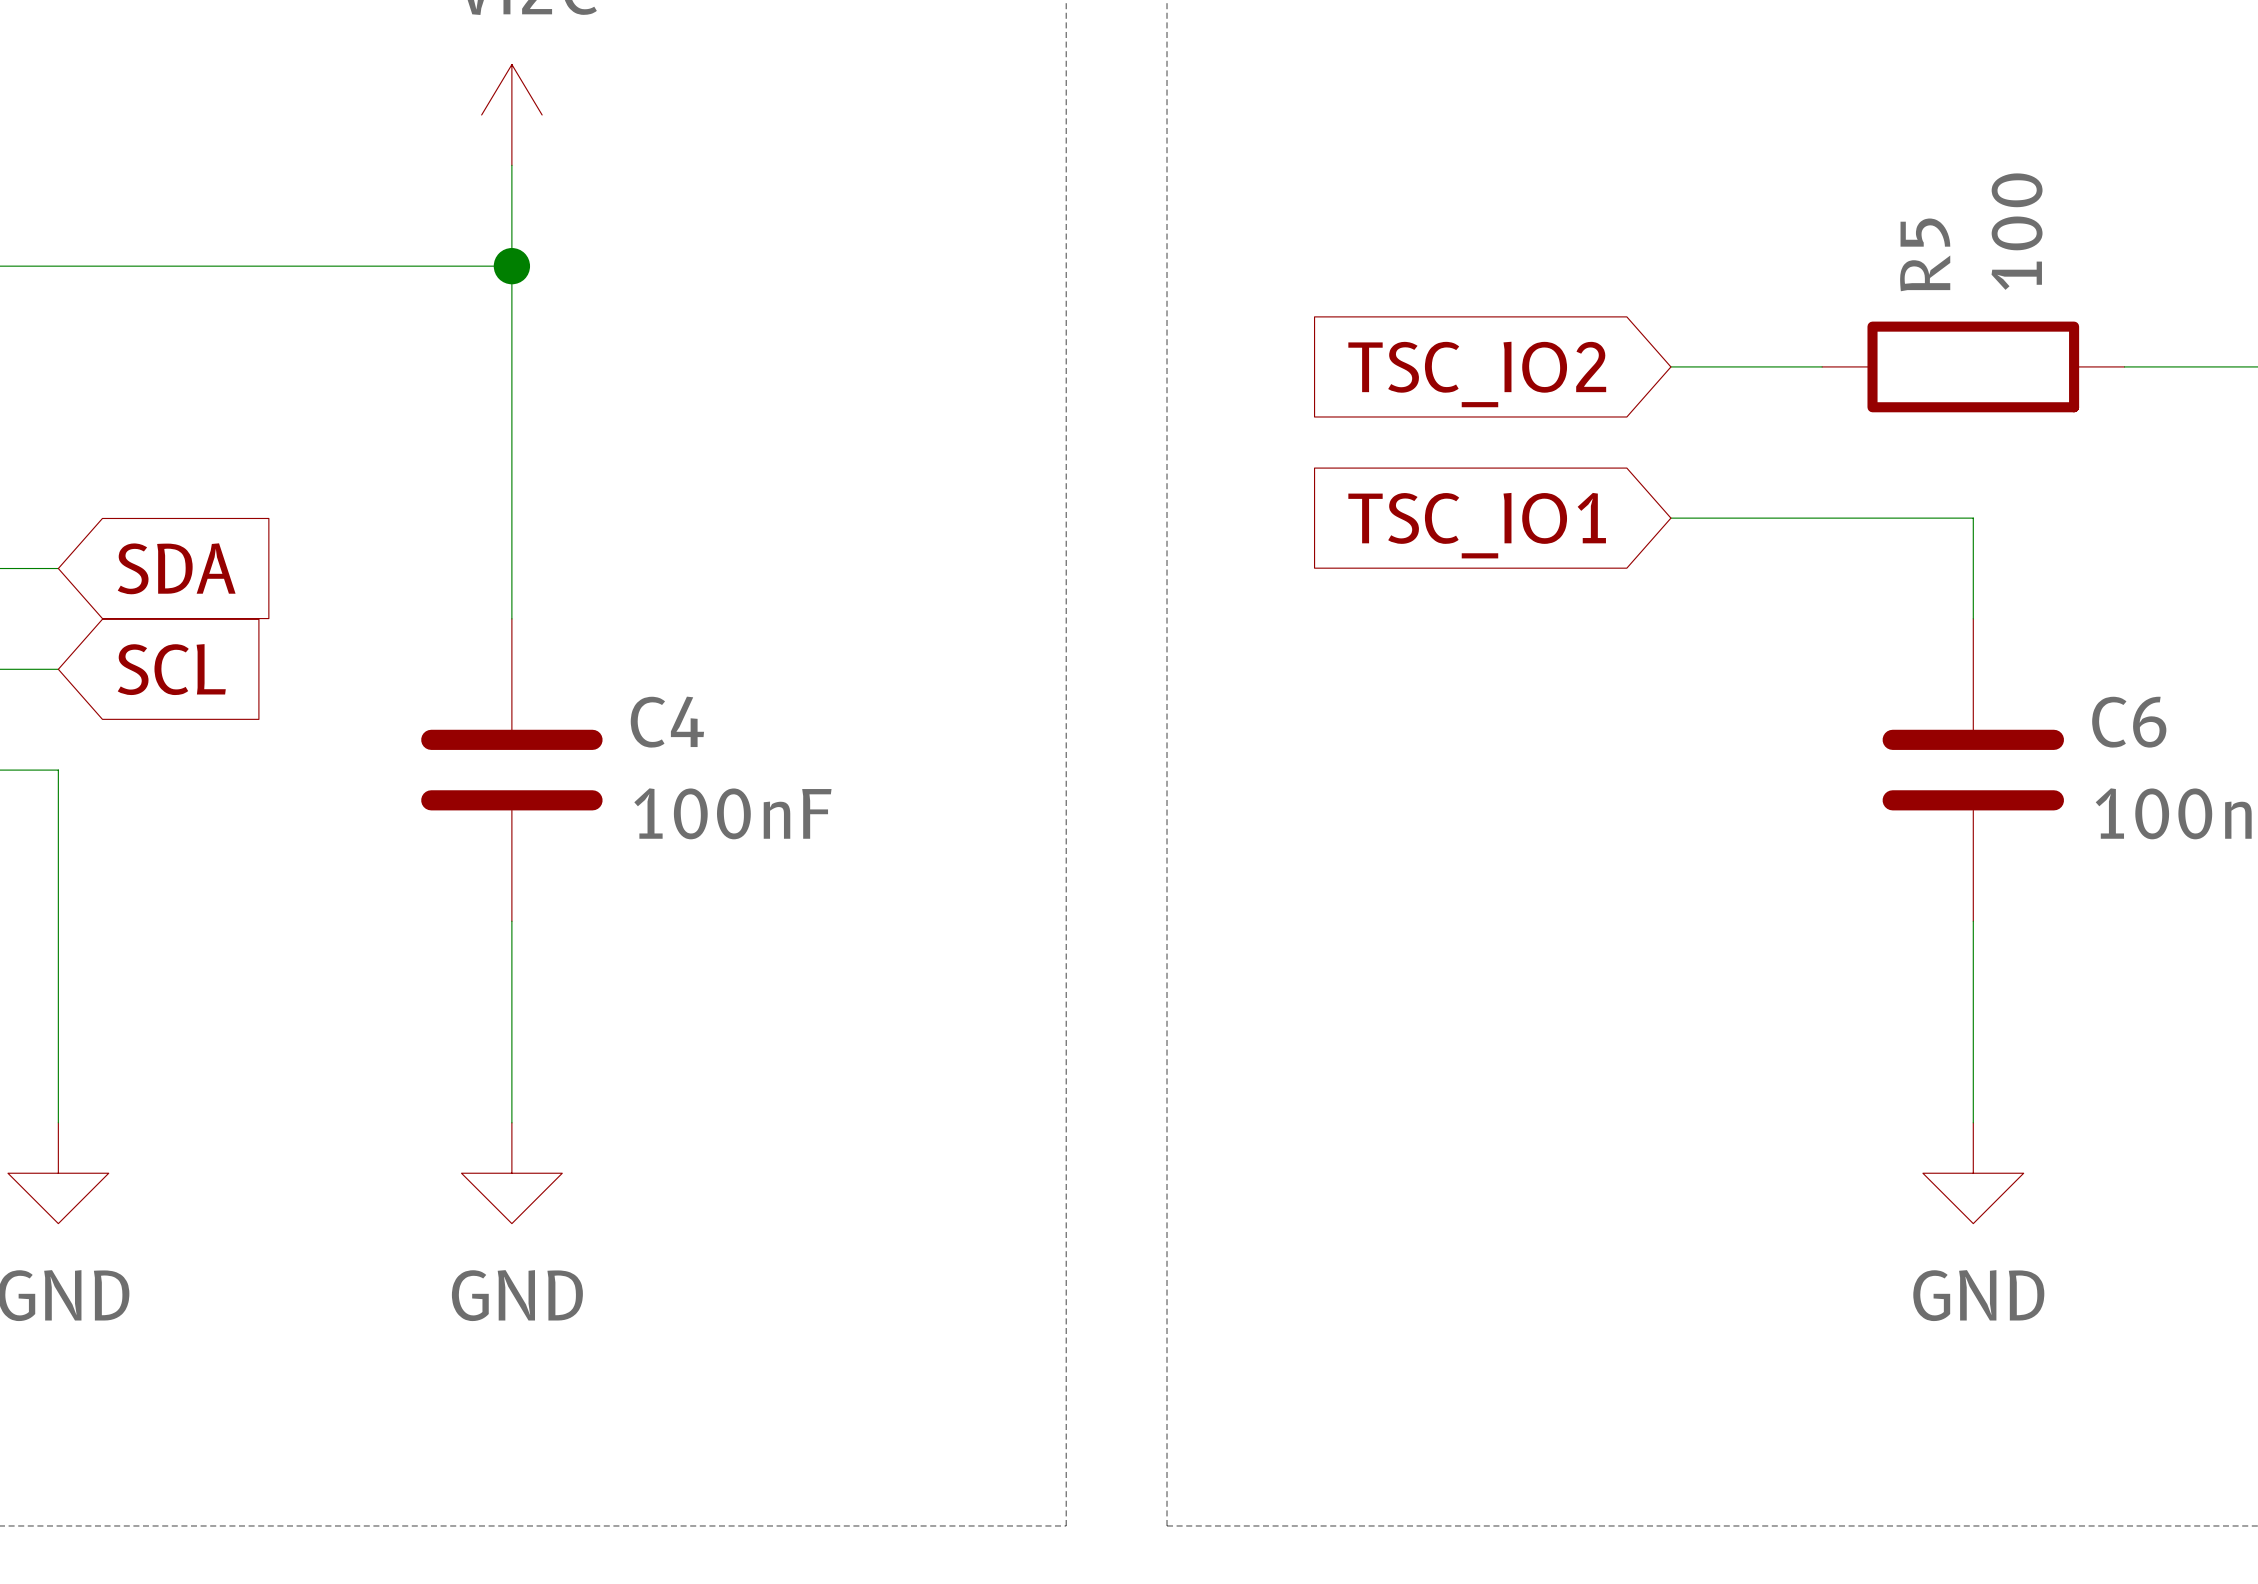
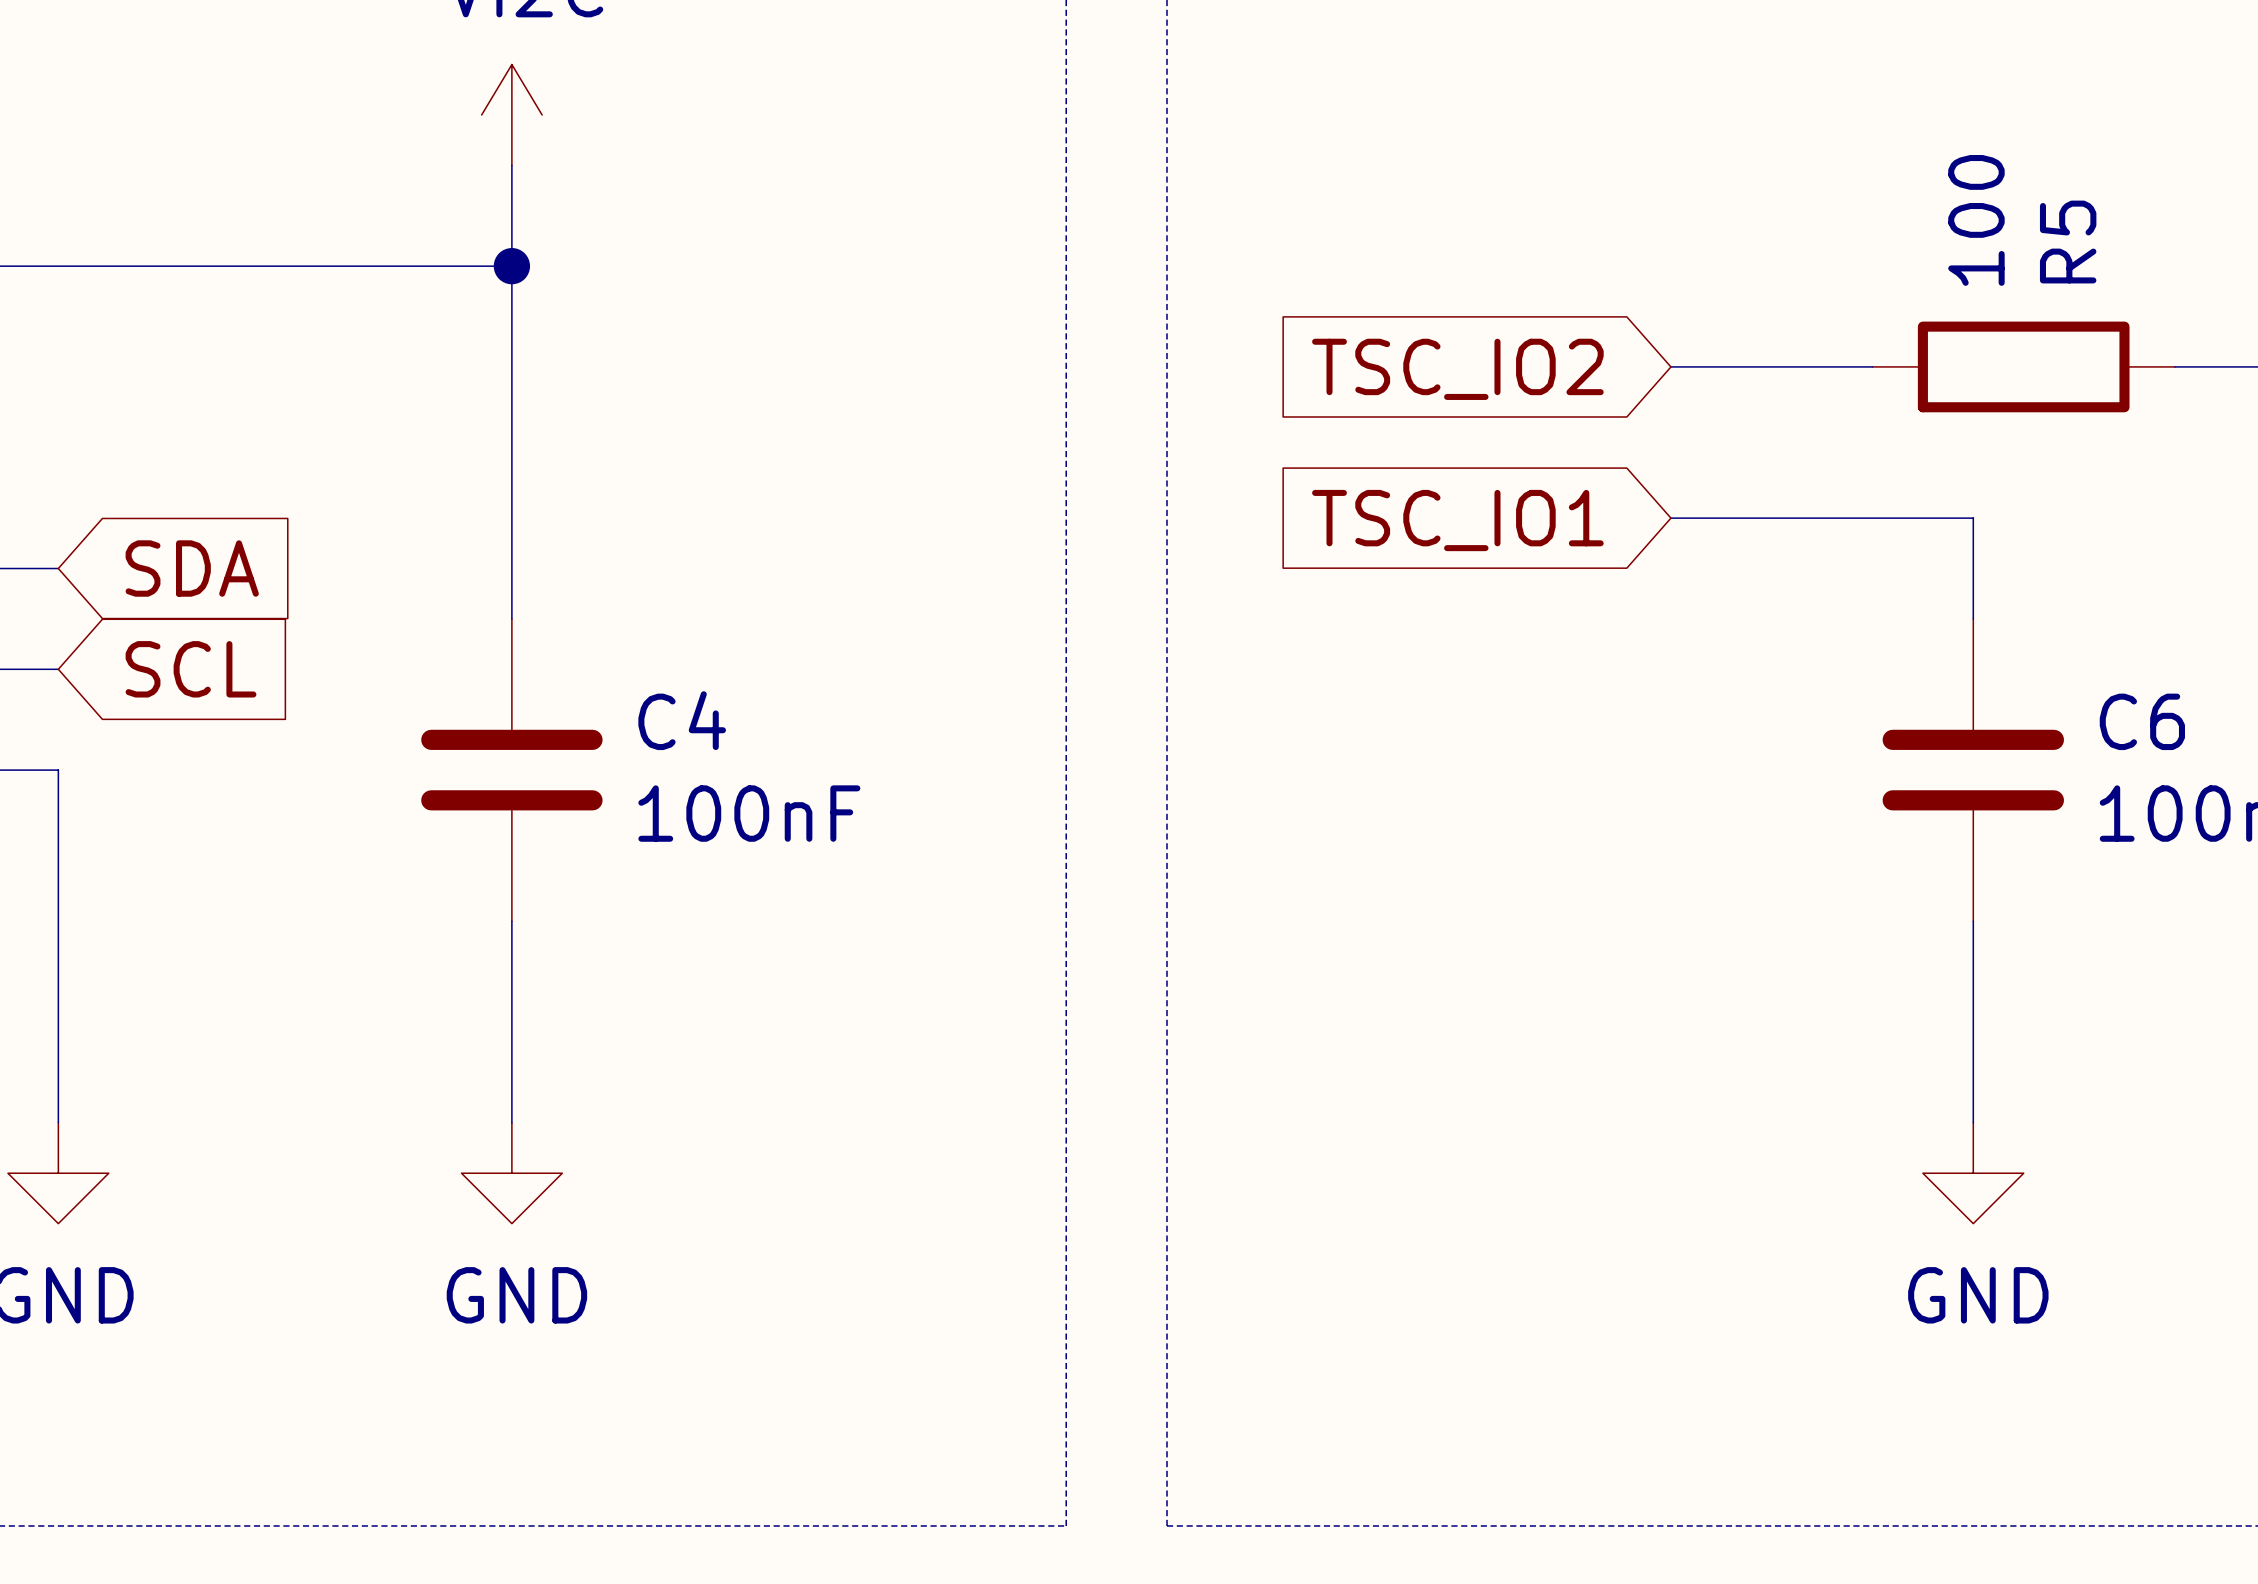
R5 value position: 100 (2017, 231) -> 100 (1976, 220)
R5 name position: R5 (1925, 254) -> R5 (2068, 242)
R5 position: (1973, 366) -> (2023, 366)

